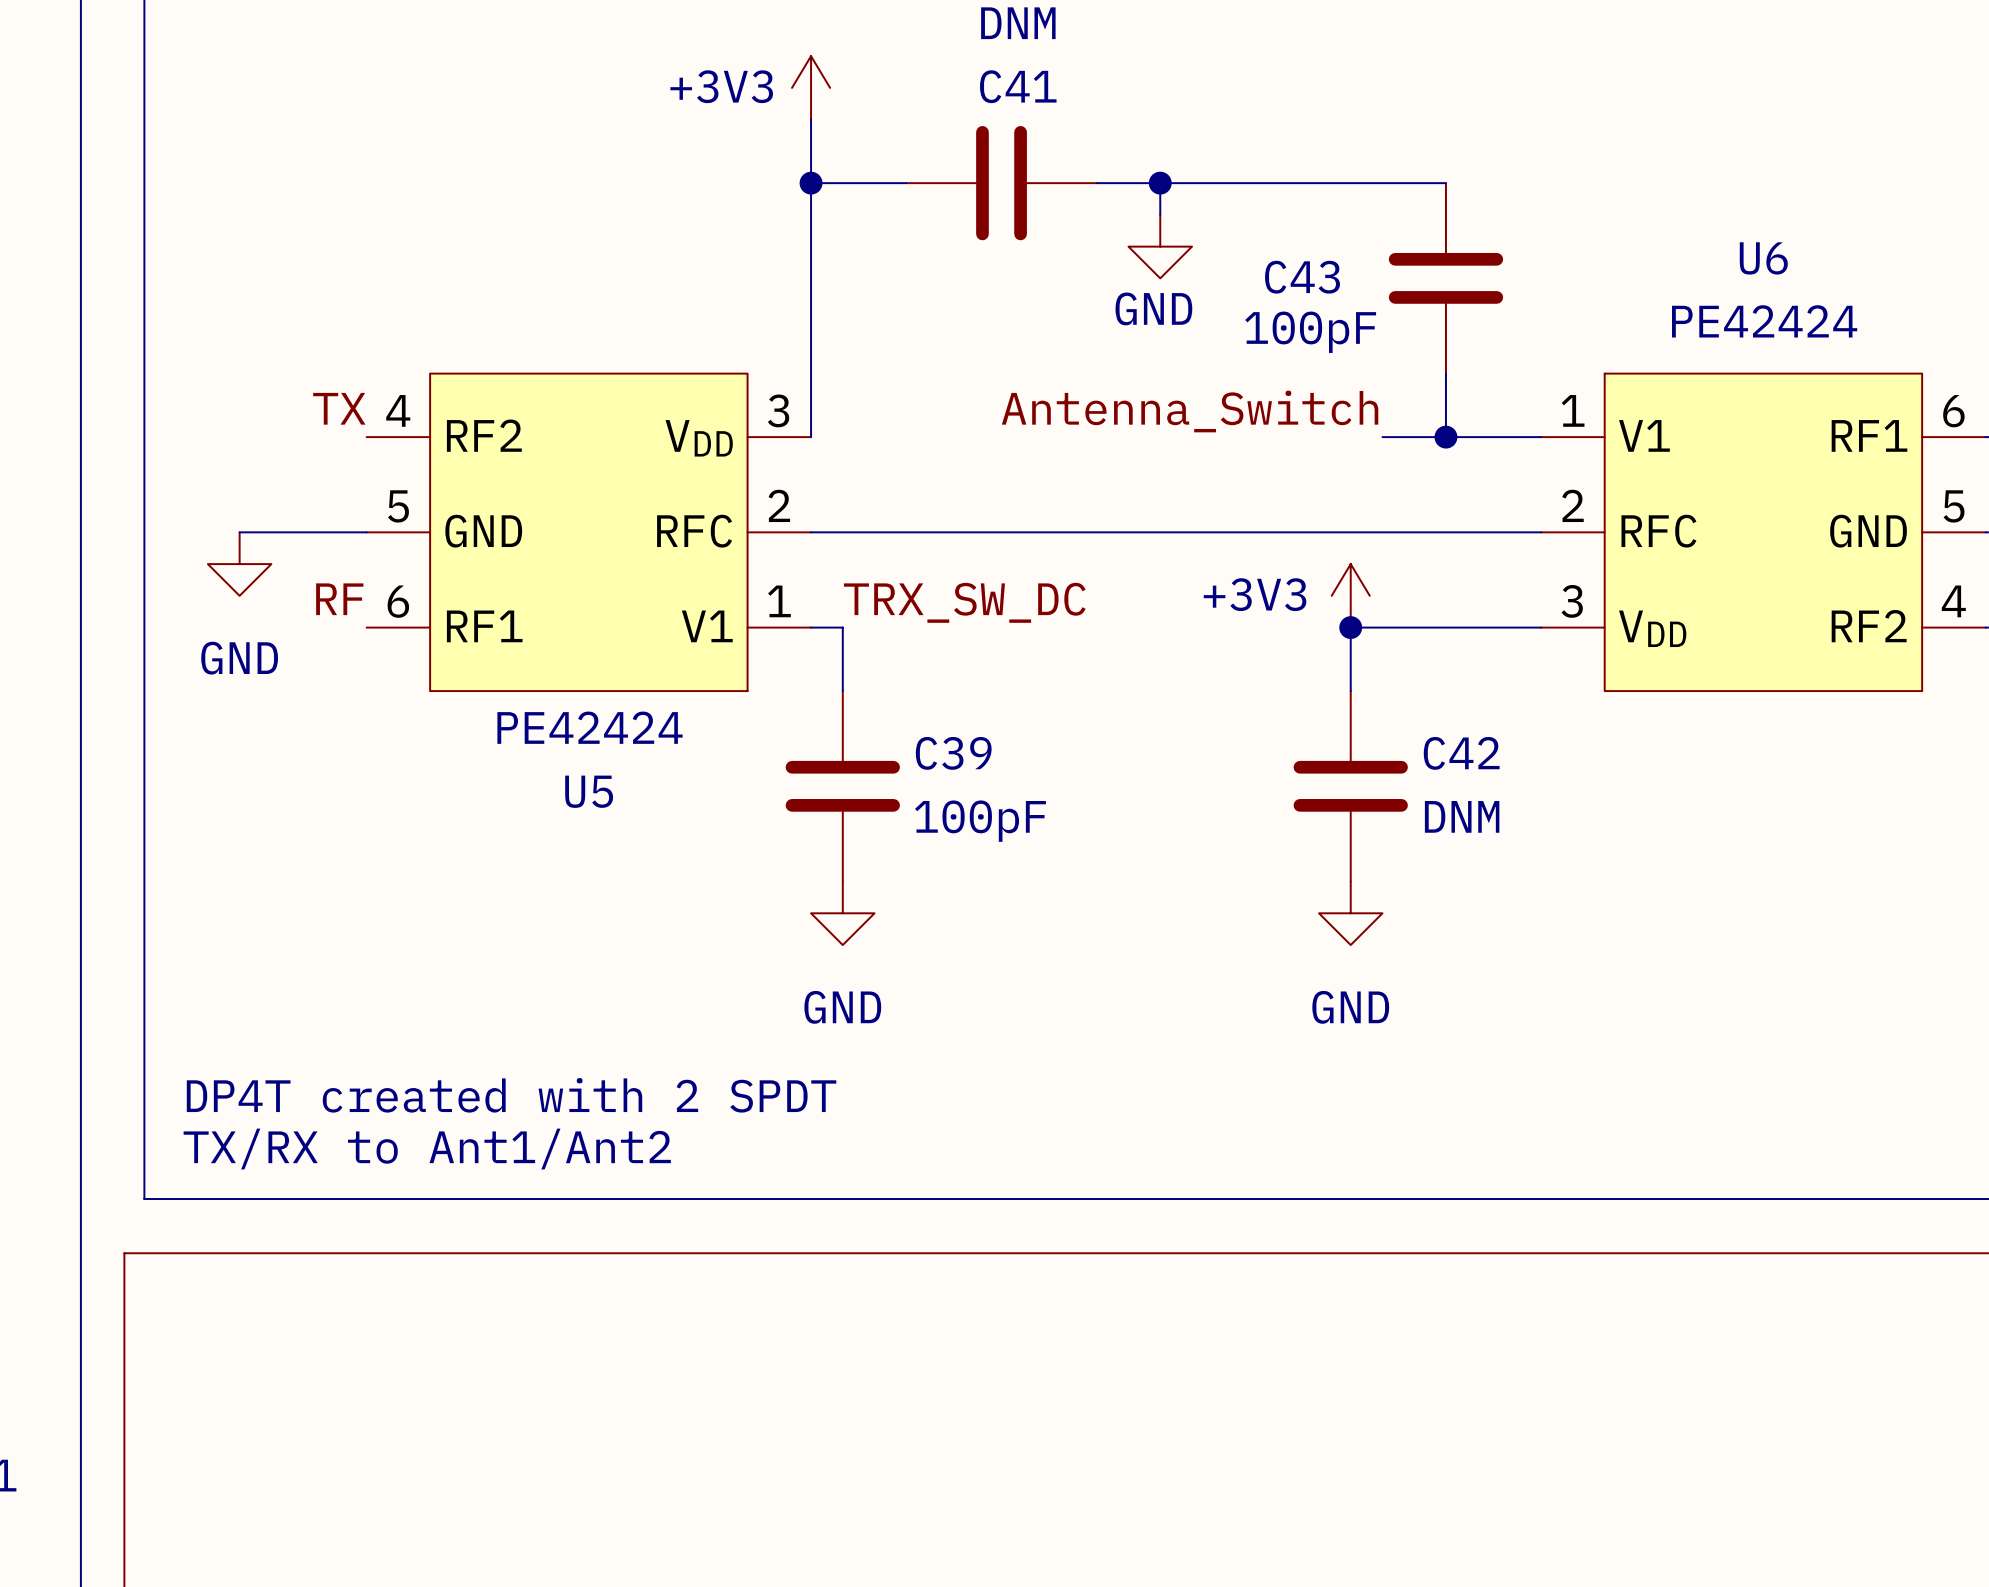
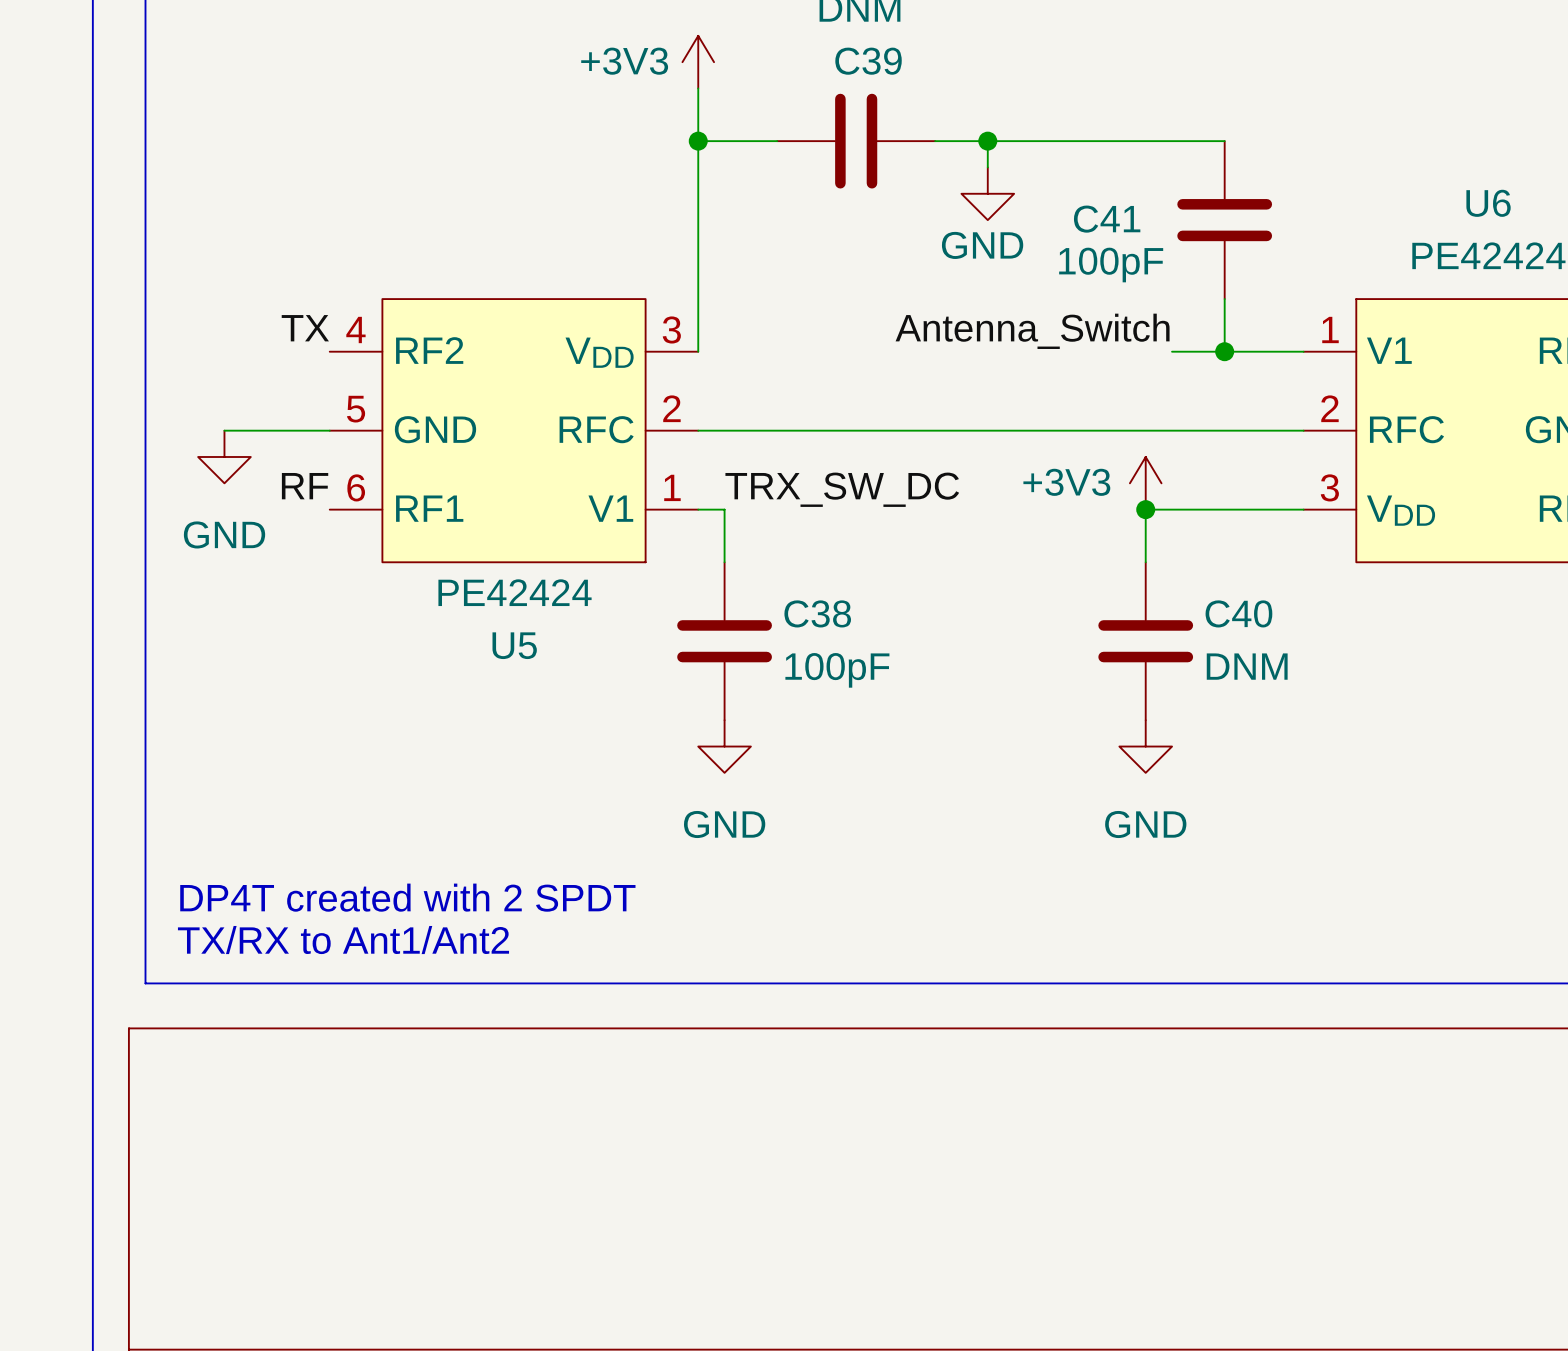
C41 name: C41 (1018, 86) -> C39 (868, 61)
C43 name: C43 (1302, 277) -> C41 (1107, 219)
C39 name: C39 (953, 753) -> C38 (817, 613)
C42 name: C42 (1461, 753) -> C40 (1238, 613)

